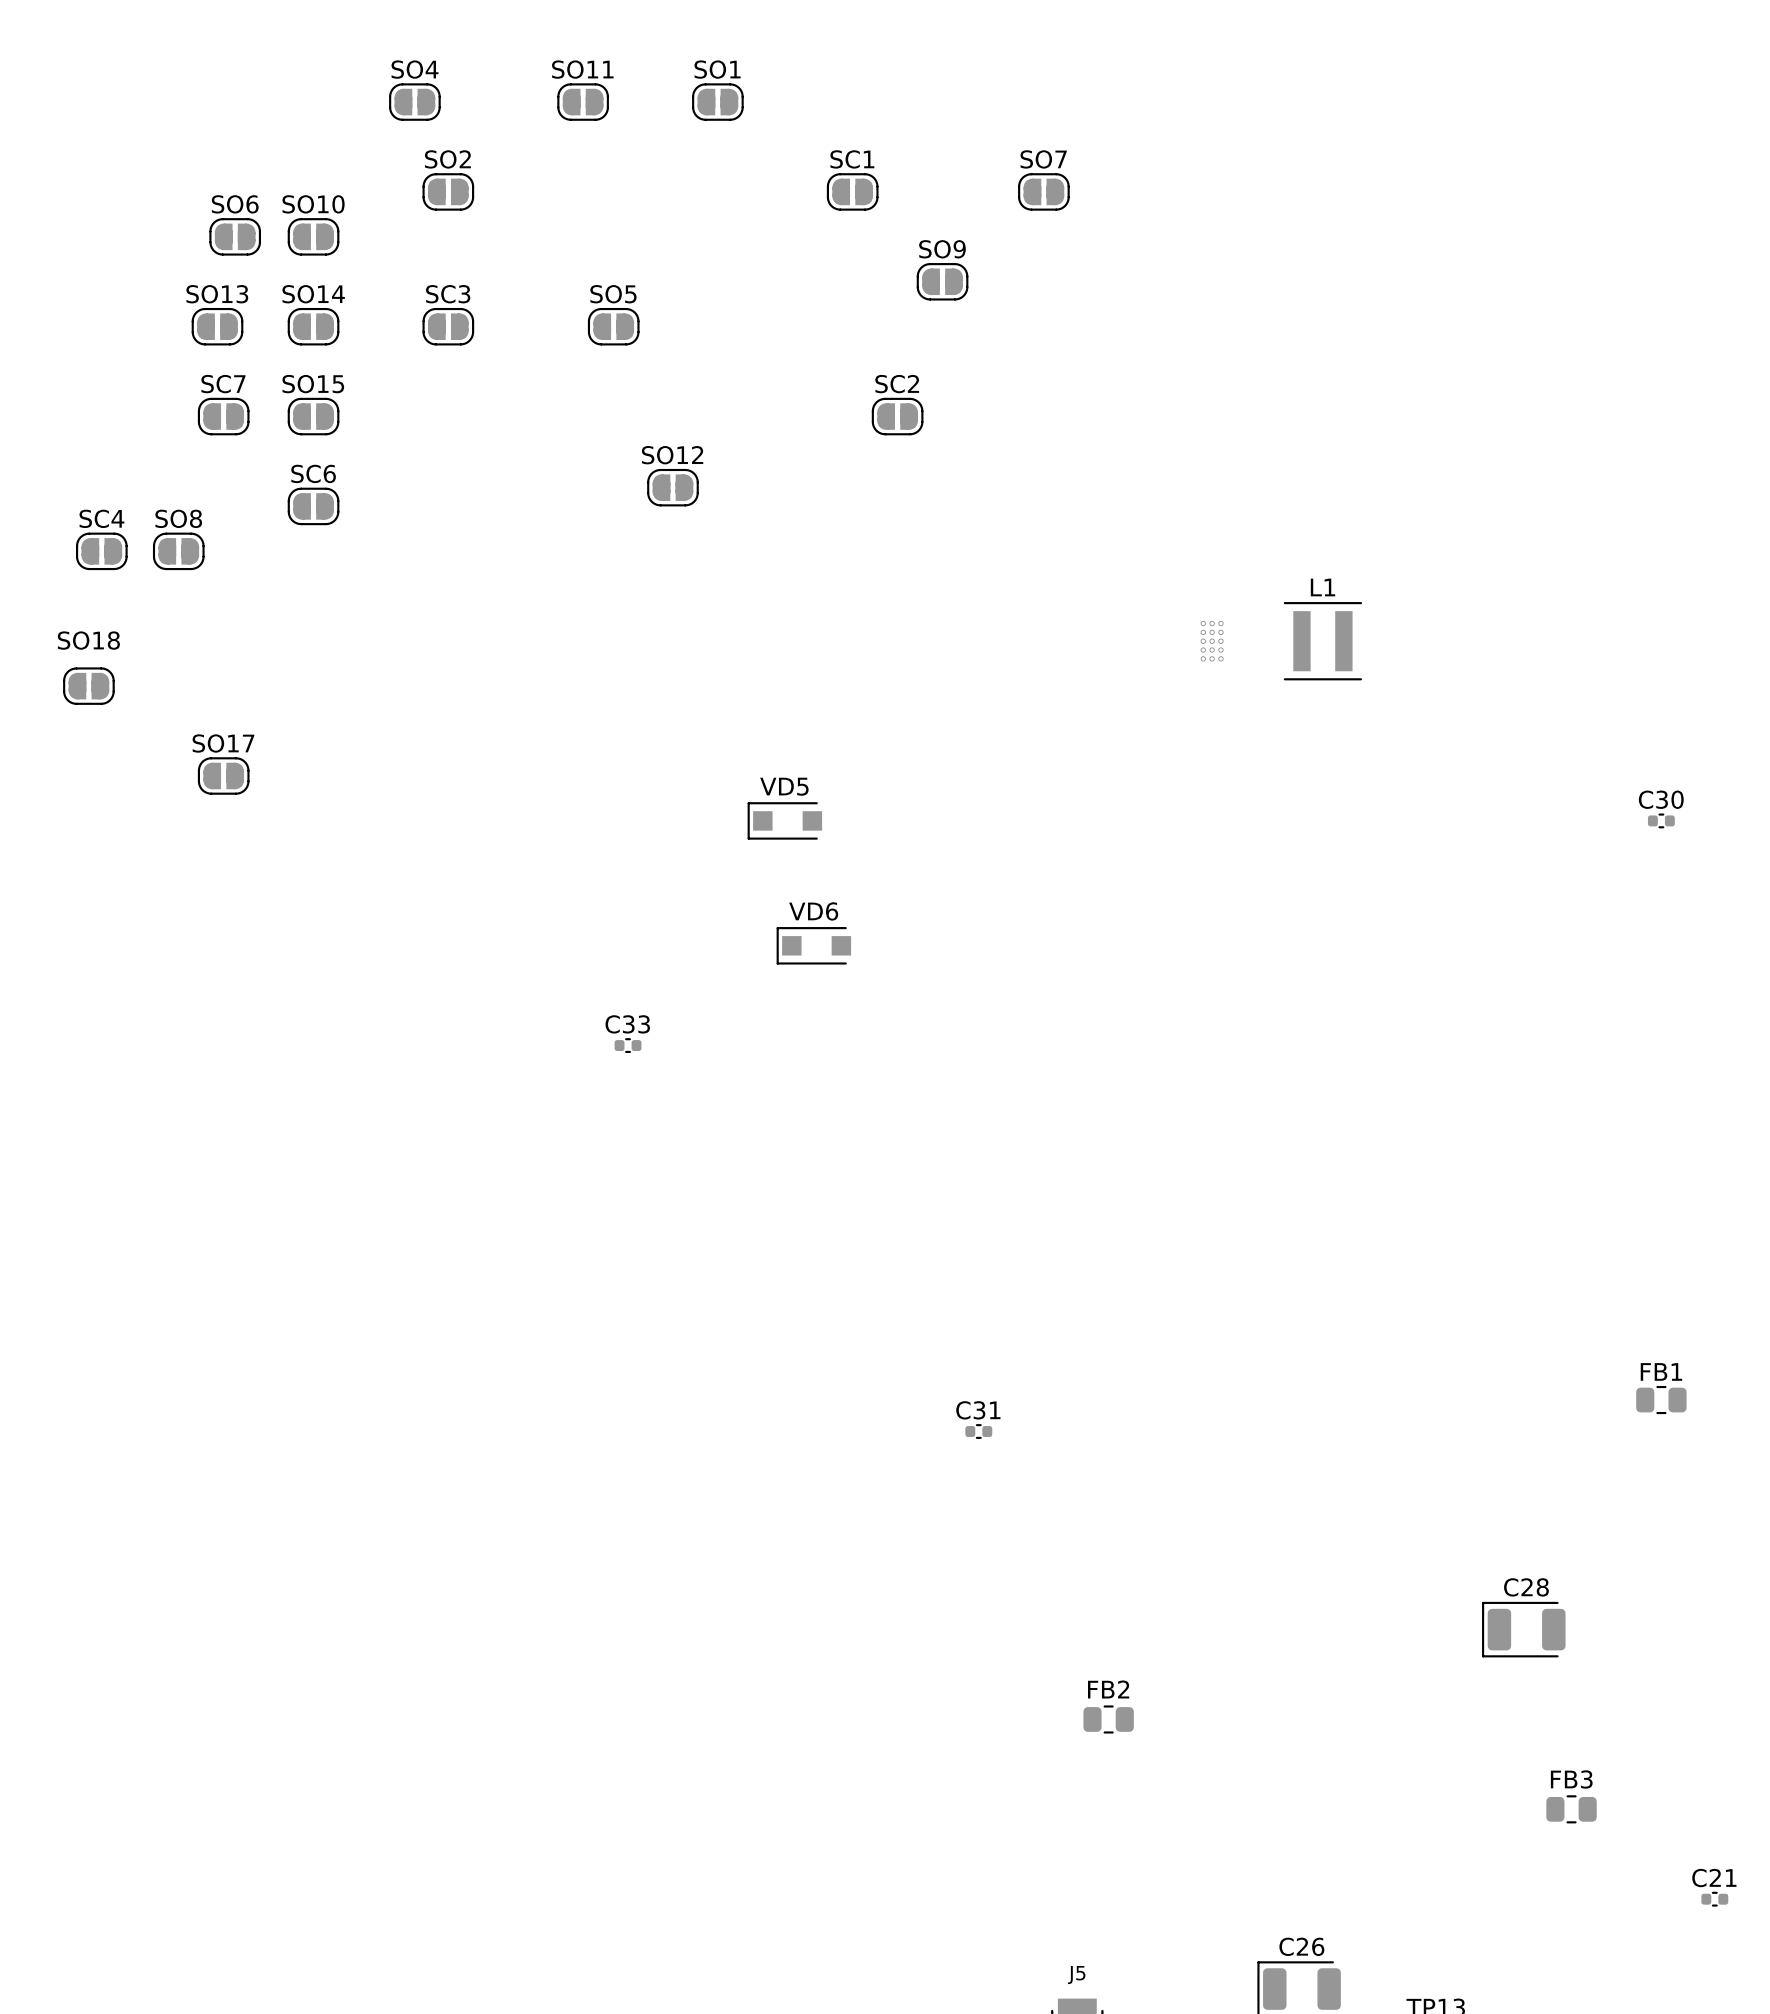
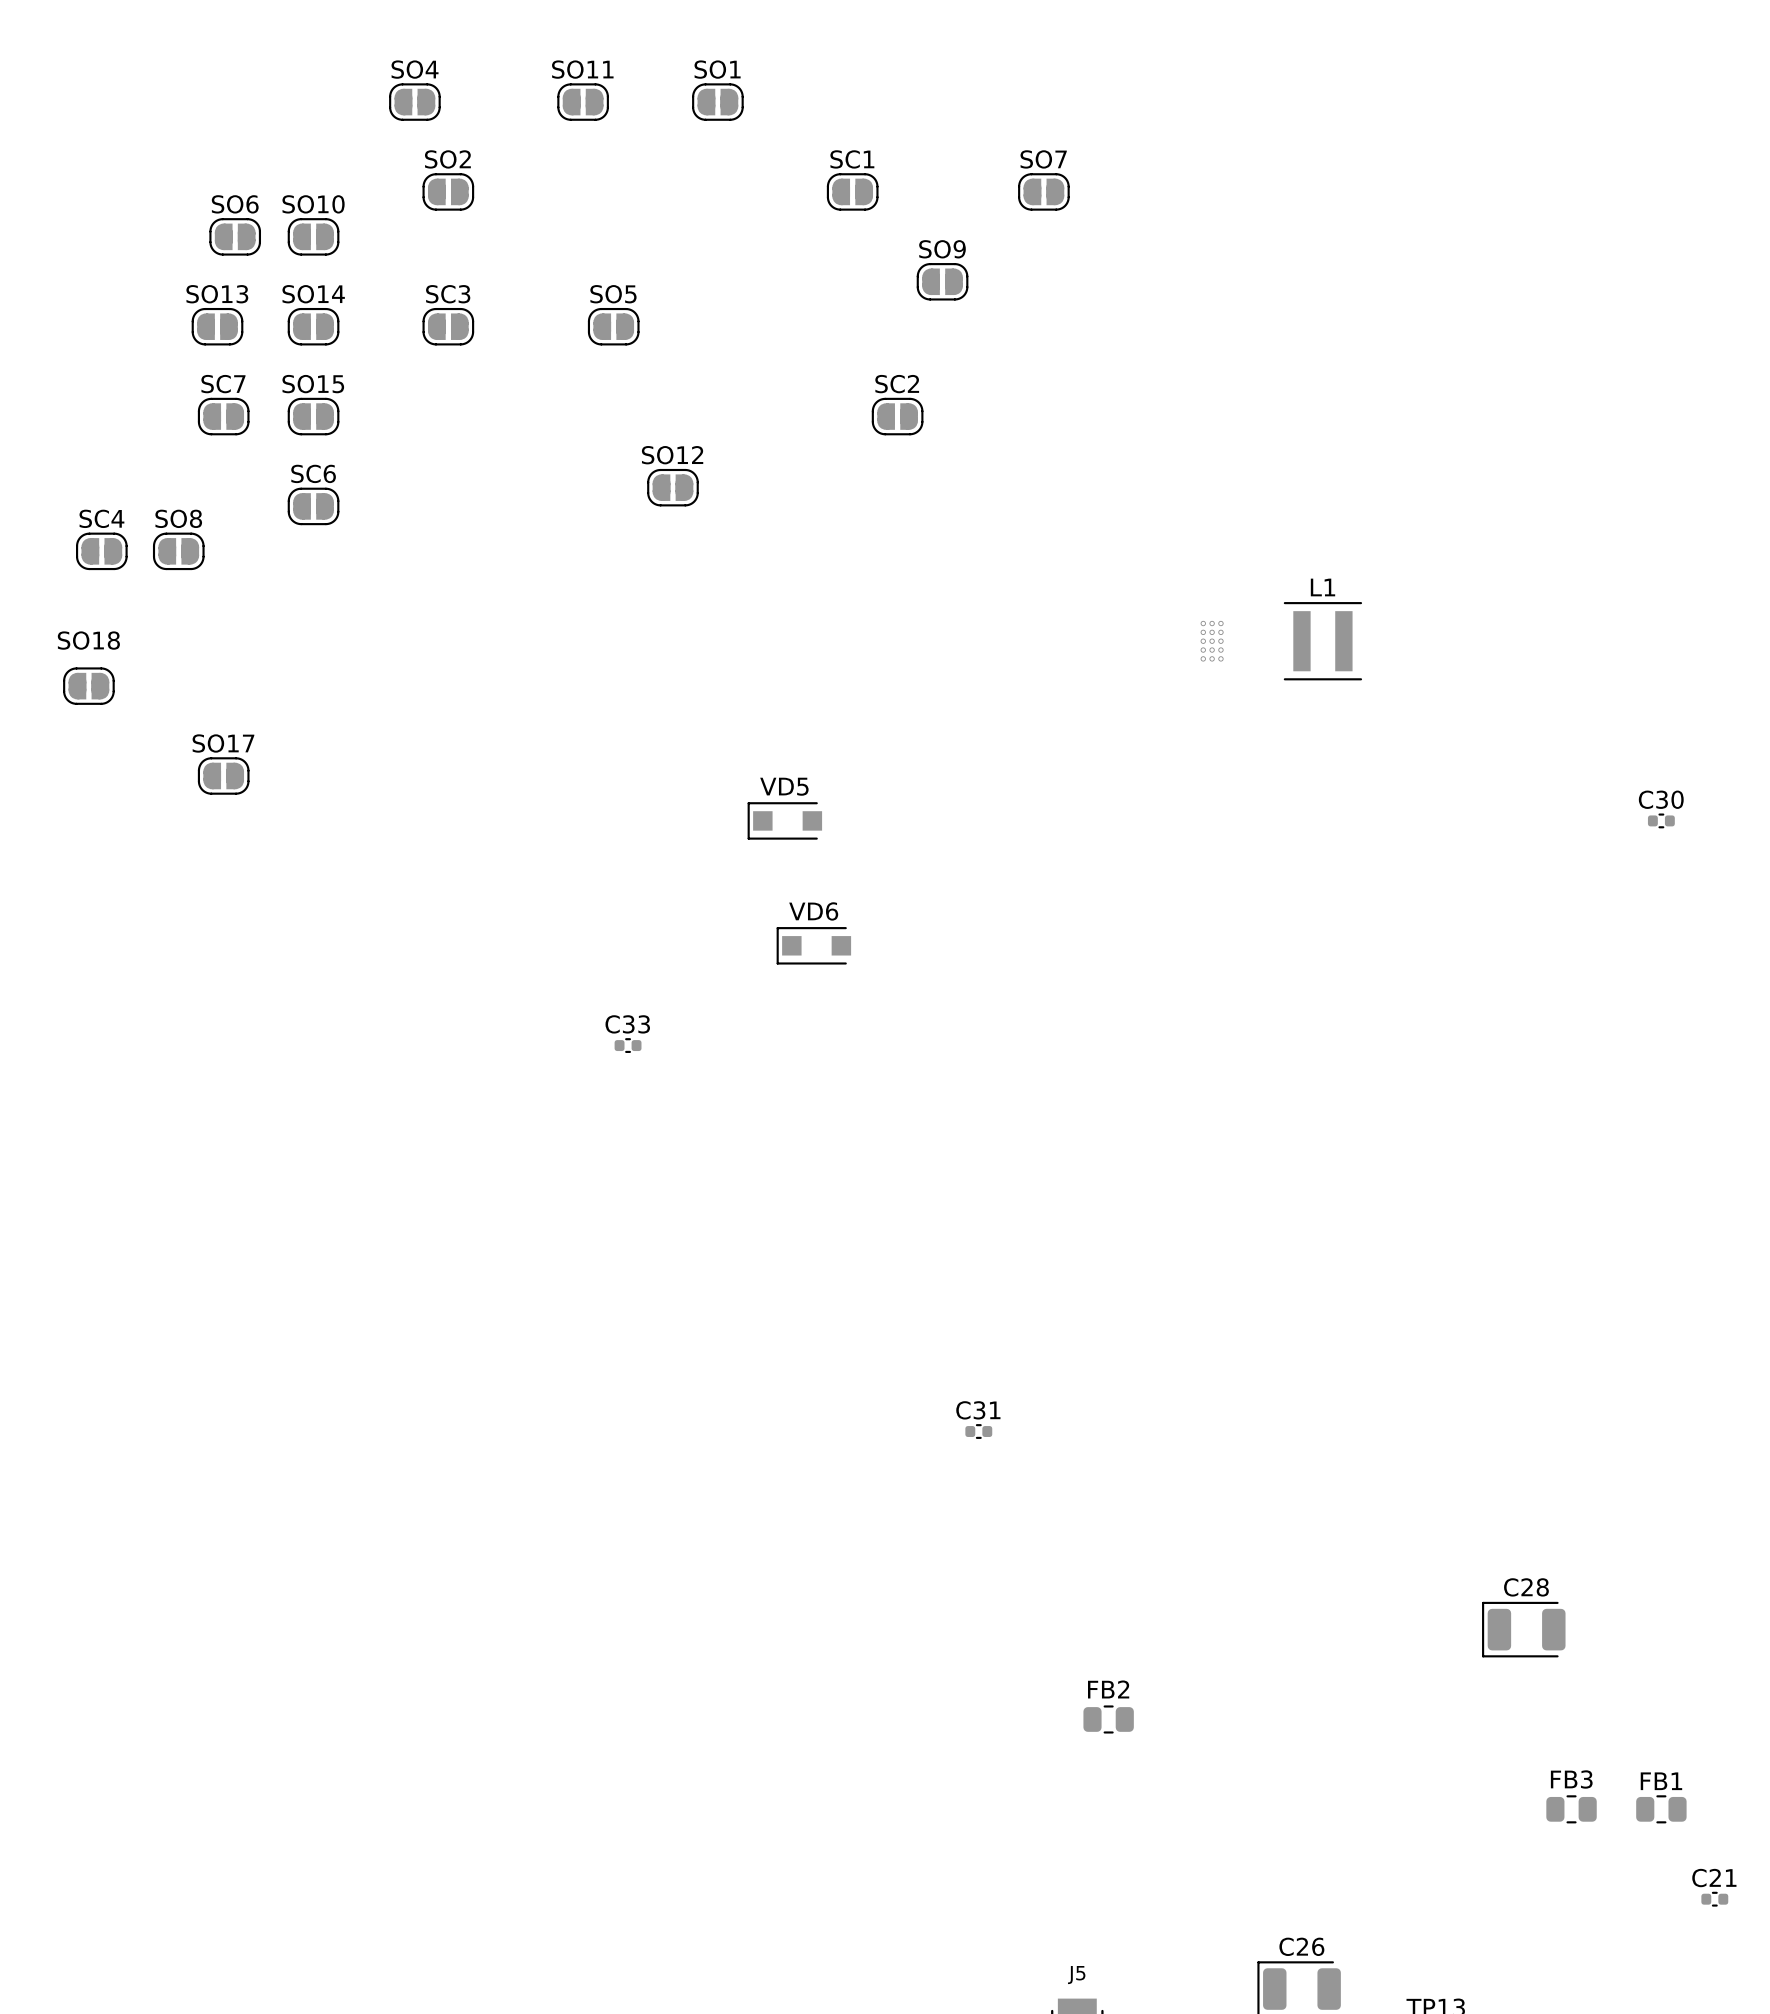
FB1 position: (1661, 1400) -> (1661, 1809)

